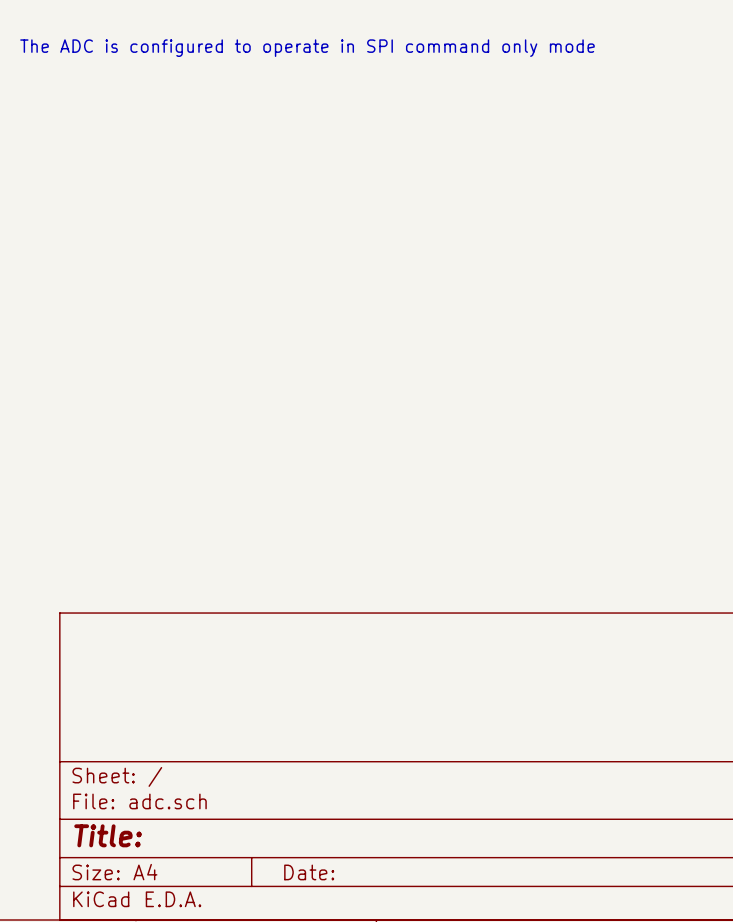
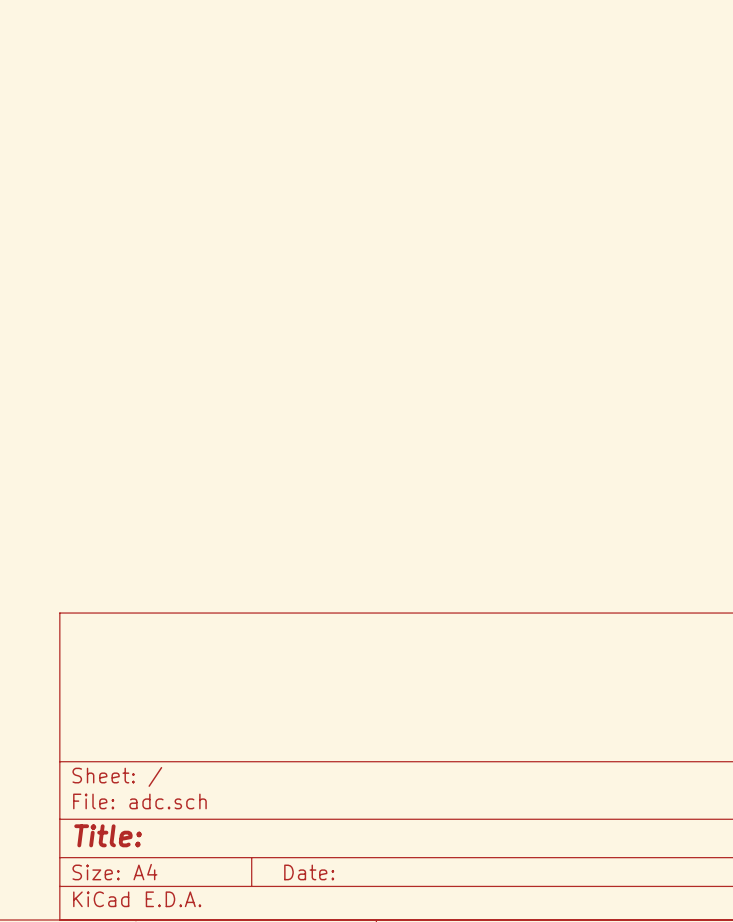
text: The ADC is configured to operate in SPI command only mode (307, 48) -> none

